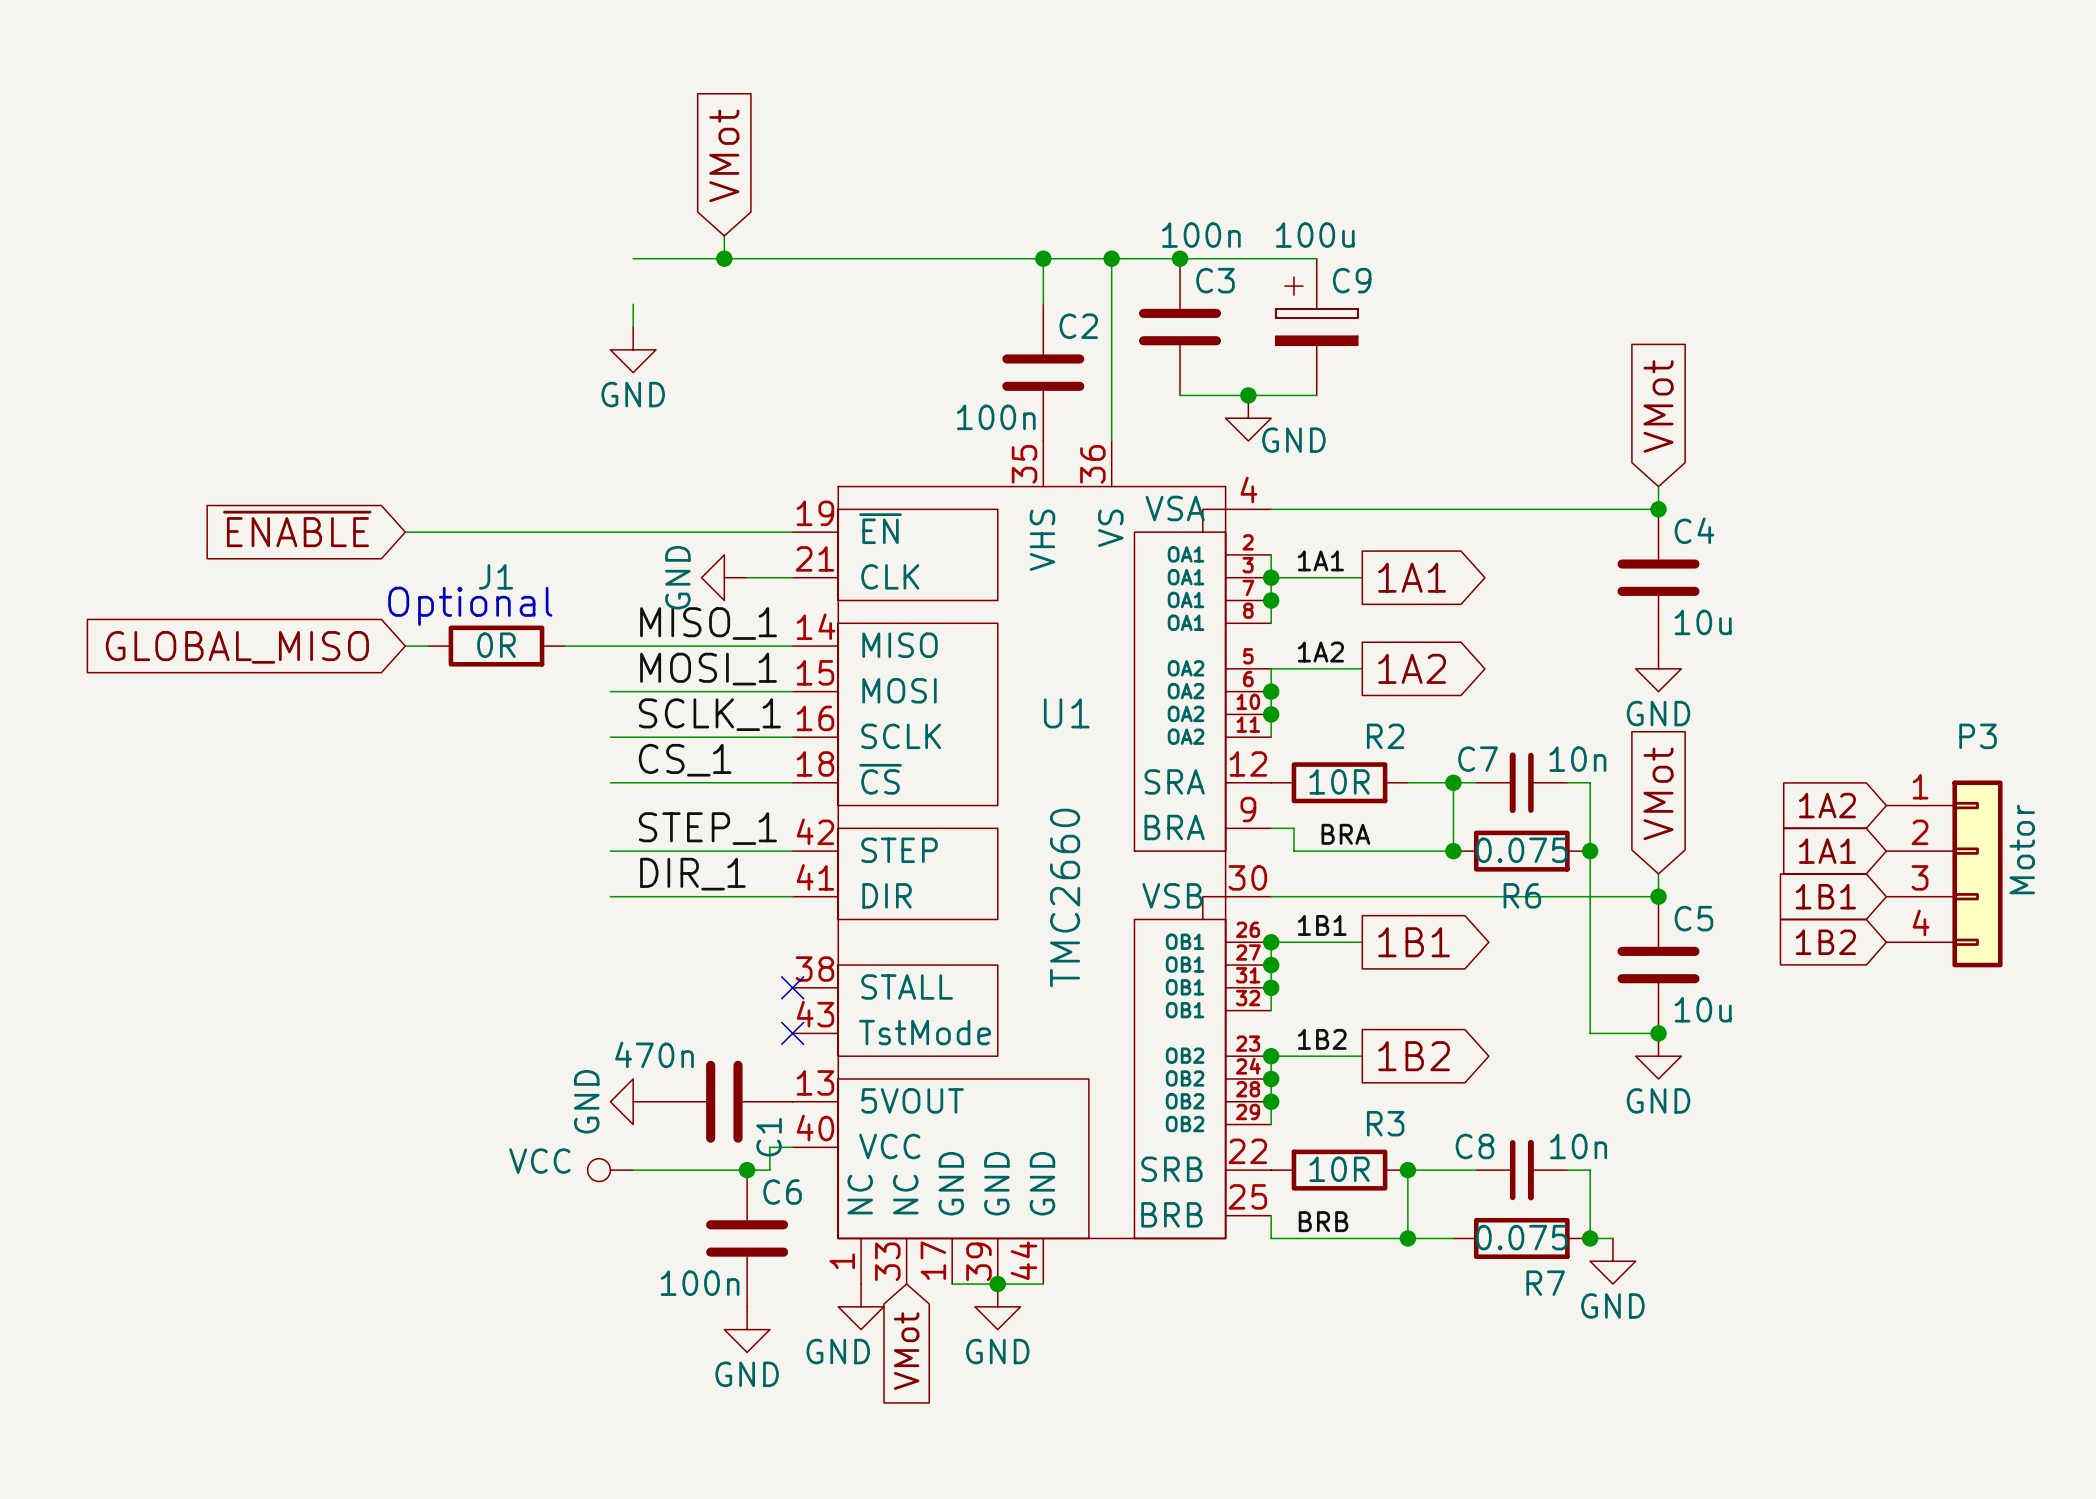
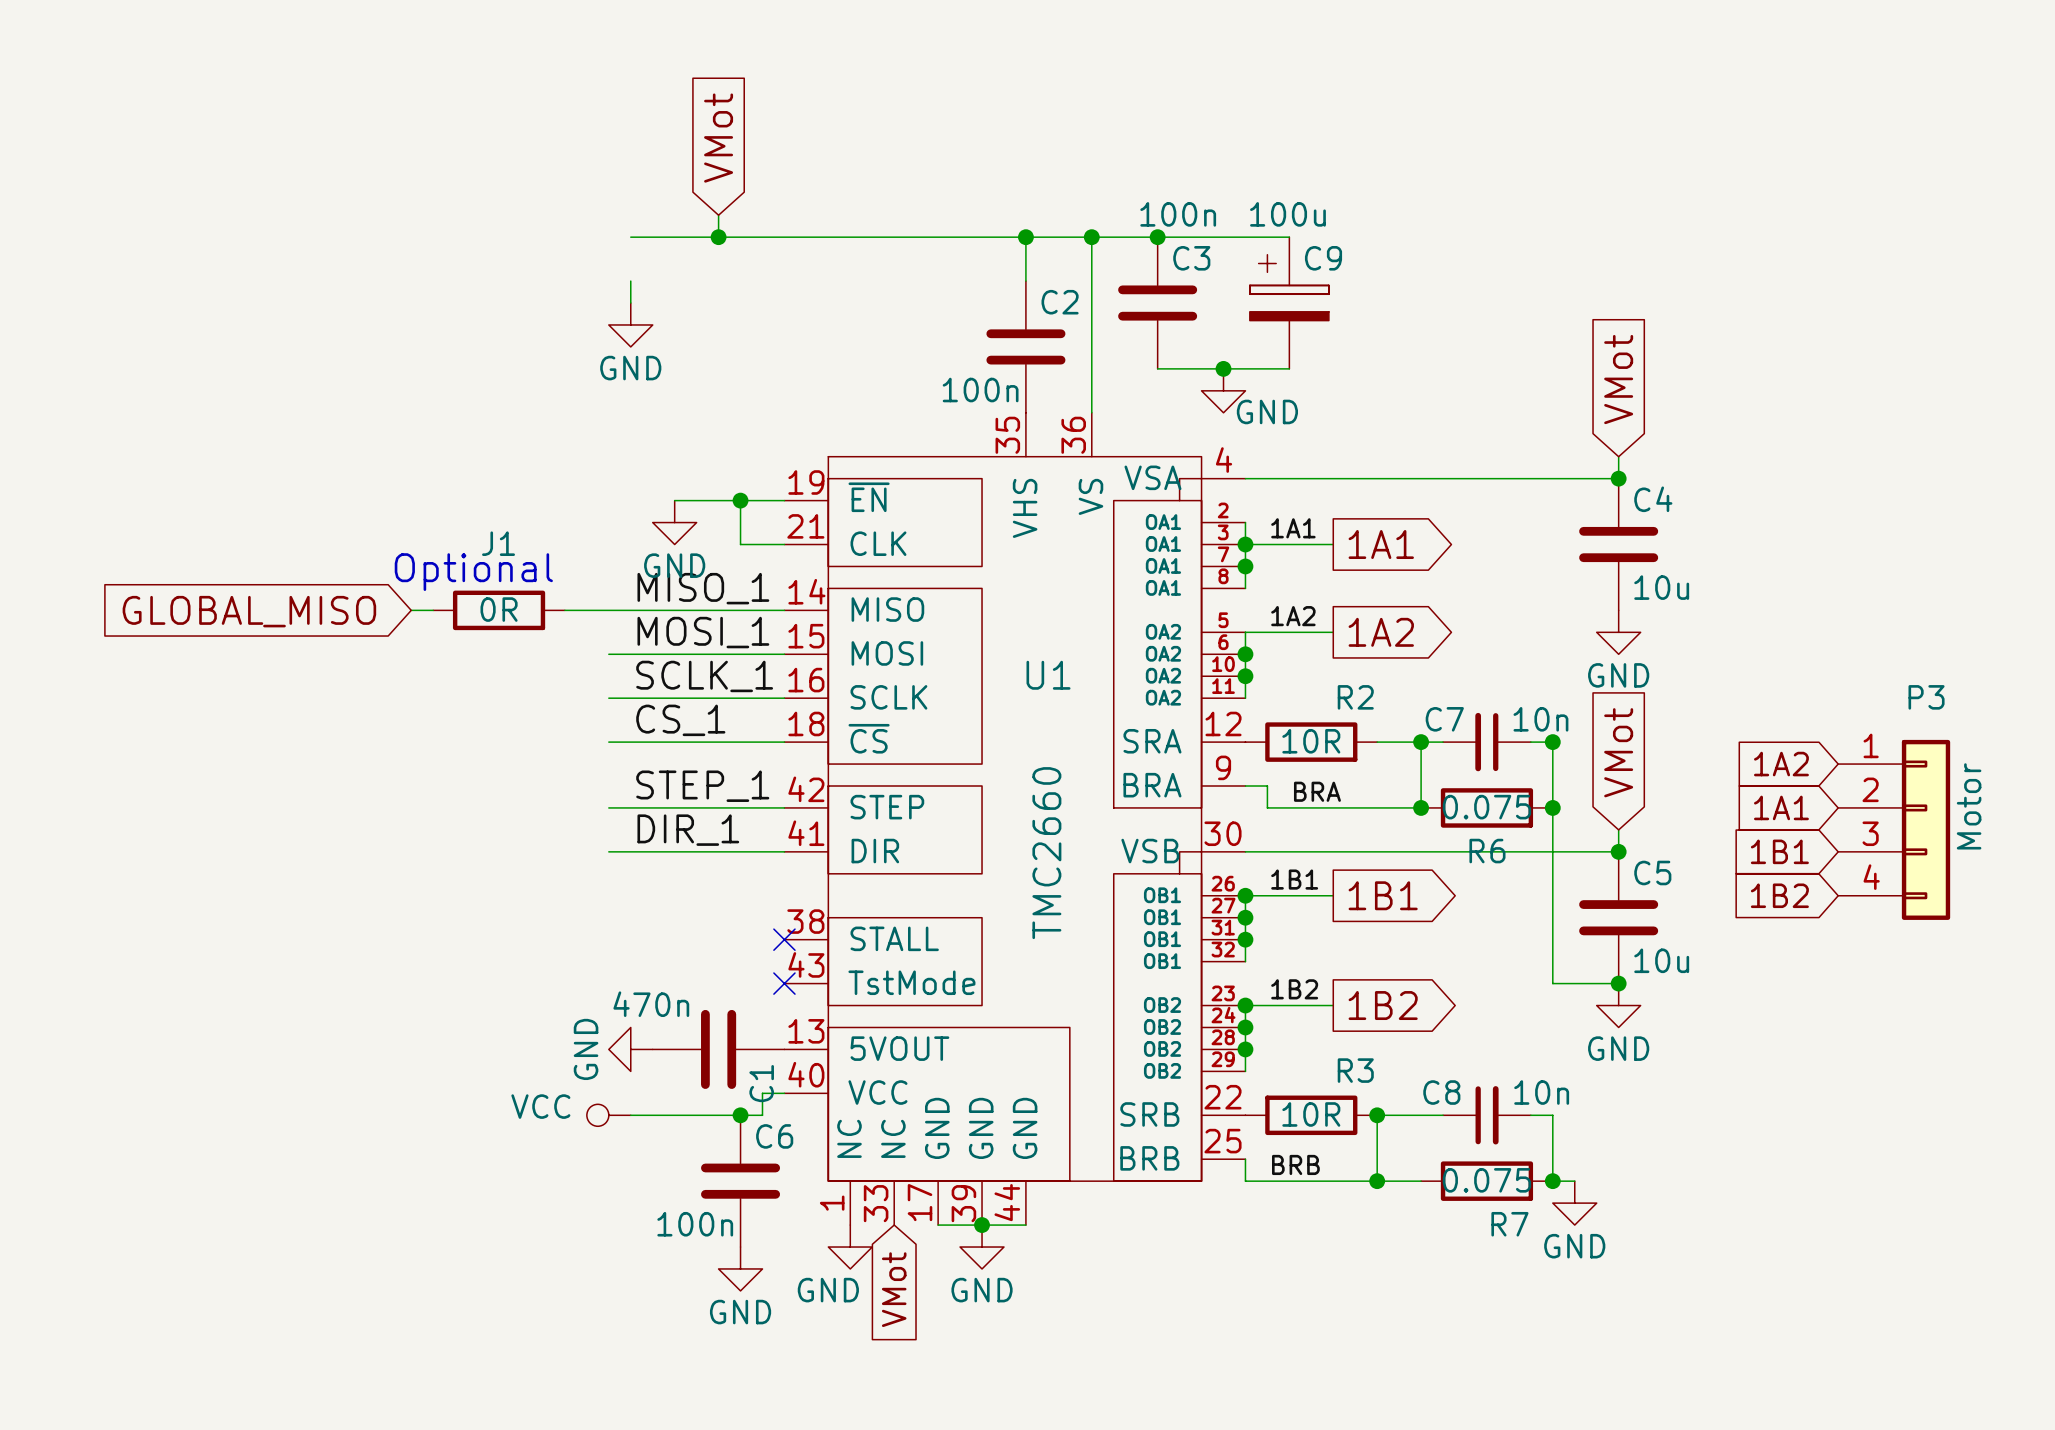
global label: ~{ENABLE} (297, 528) -> none
wire: (405, 532) (678, 532) -> none
wire: none -> (740, 500) (740, 544)
junction: none -> (740, 500)
power symbol rotation: 0° (724, 577) -> 90° counterclockwise (674, 522)
power symbol position: GND (724, 577) -> GND (674, 522)
junction: none -> (1552, 742)

